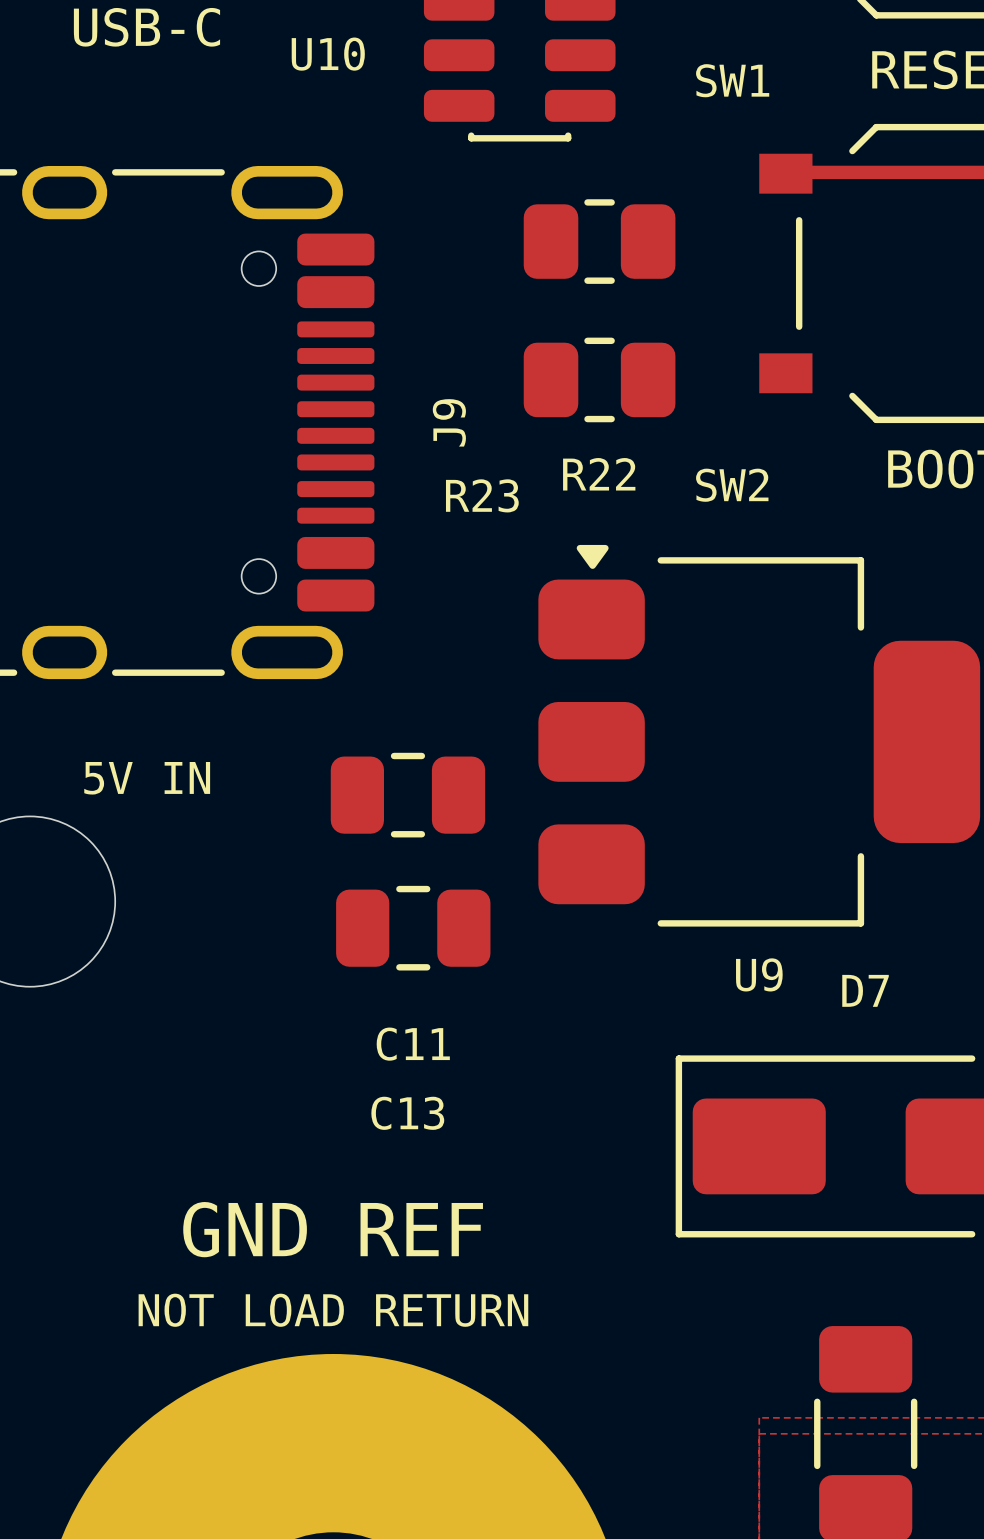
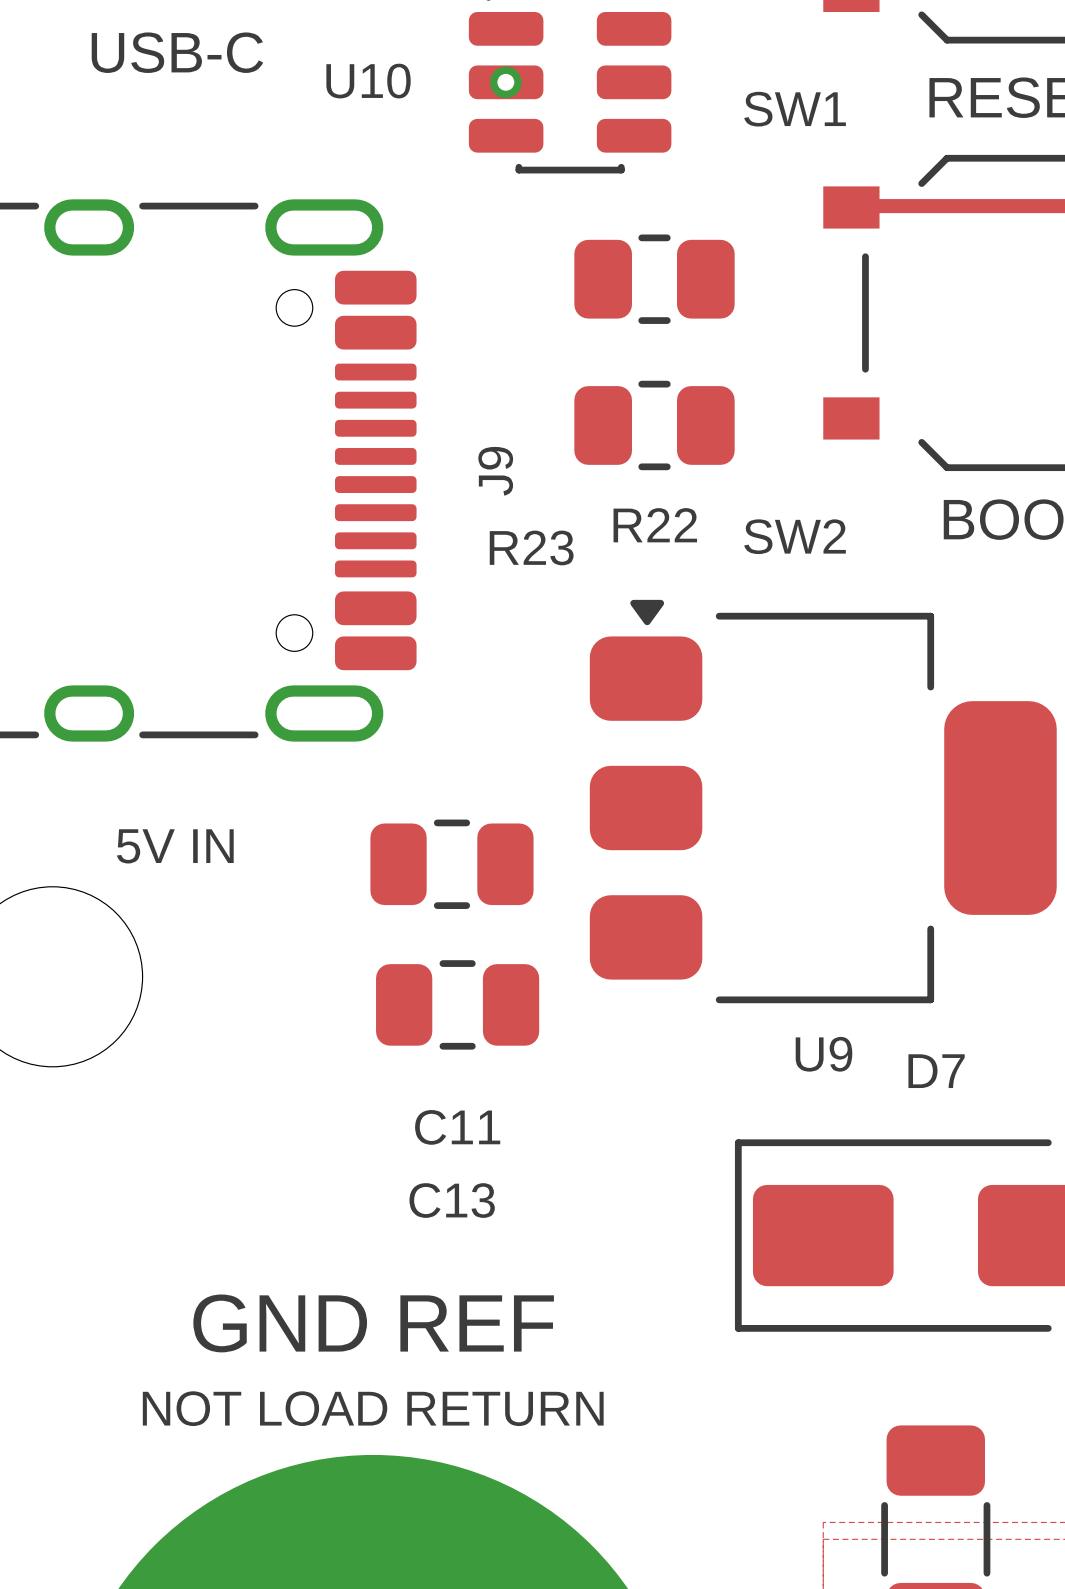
via: none -> (505, 82)

